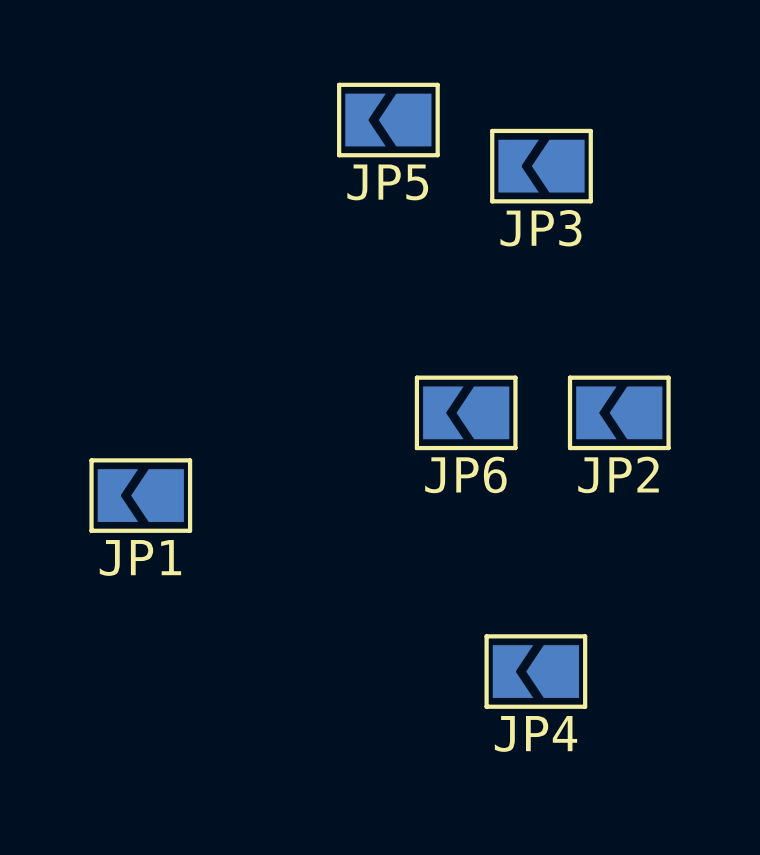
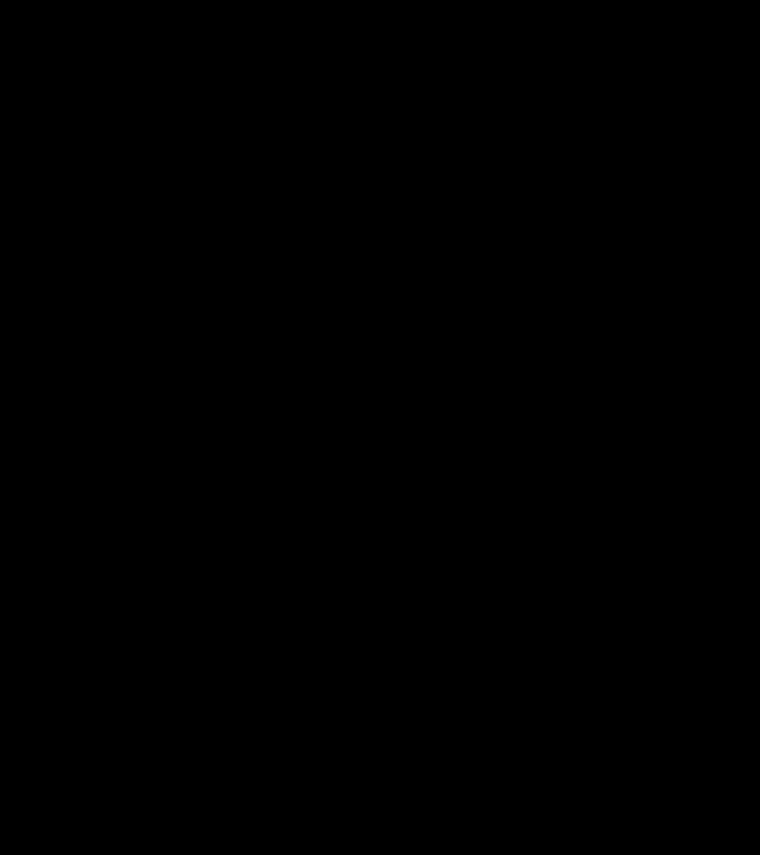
JP5: (388, 120) -> none
JP3: (541, 166) -> none
JP6: (466, 412) -> none
JP2: (619, 412) -> none
JP1: (140, 495) -> none
JP4: (535, 671) -> none

